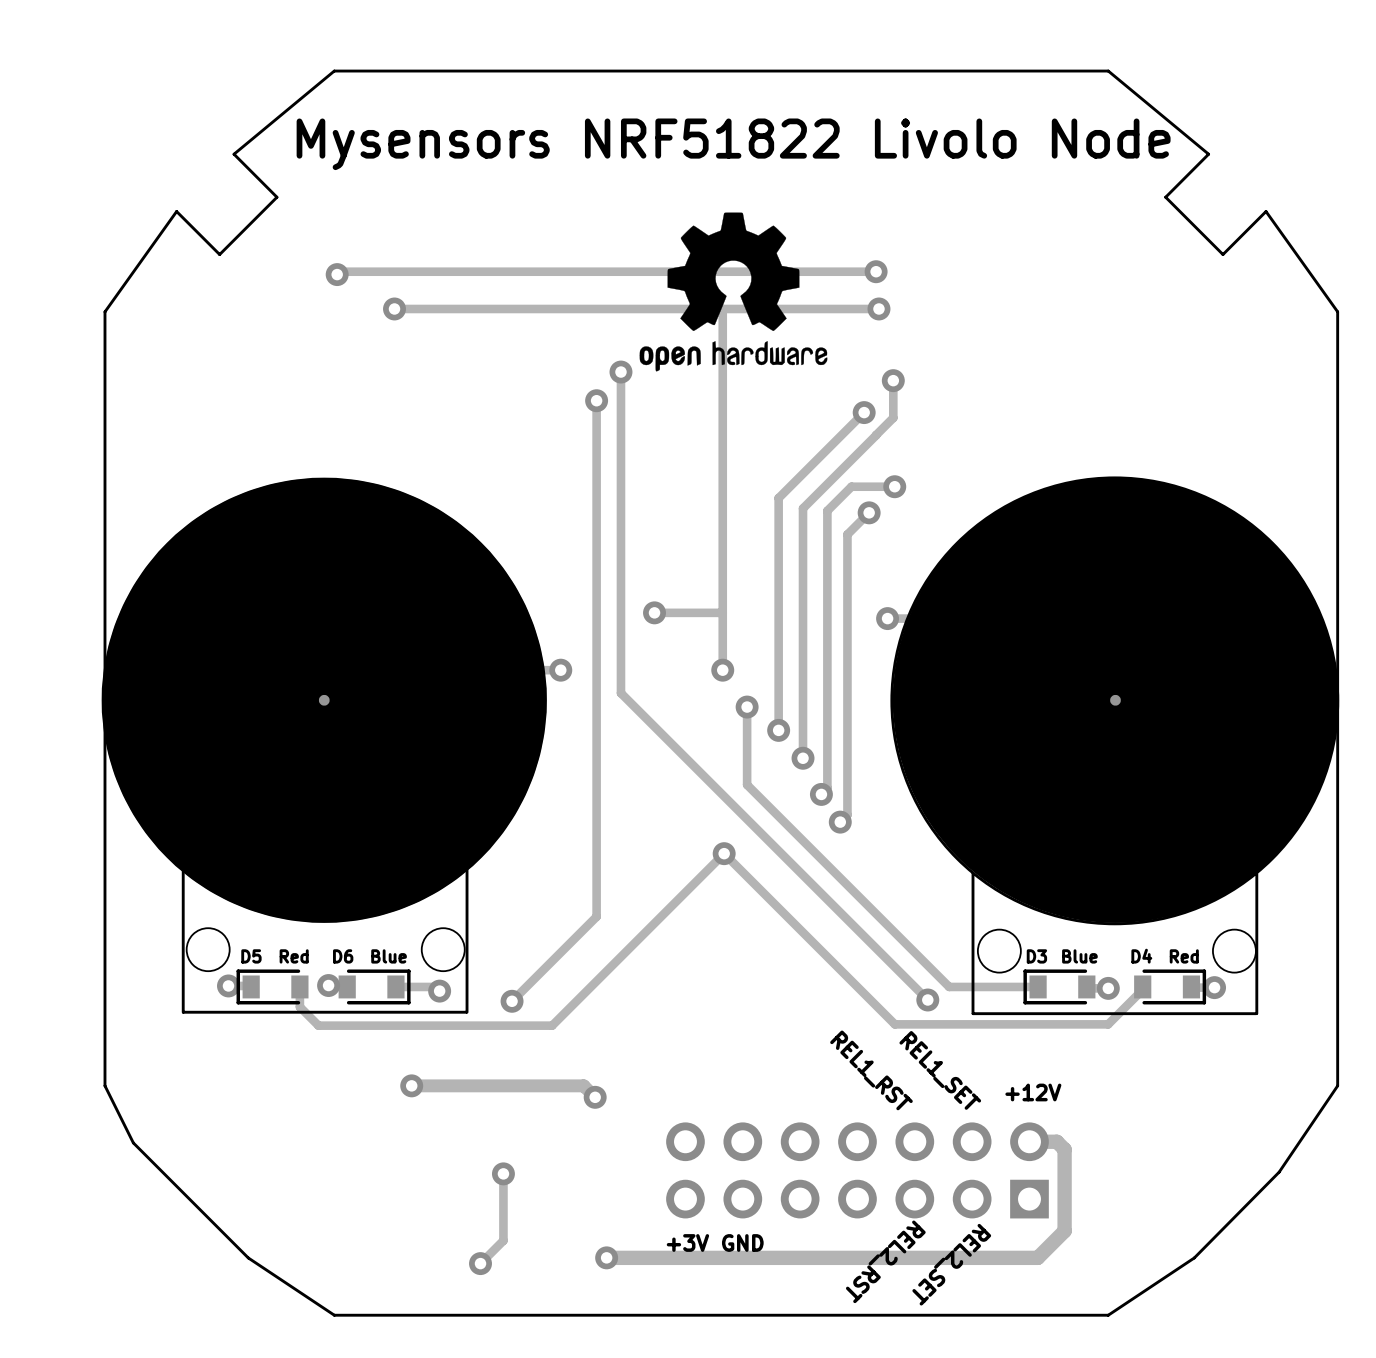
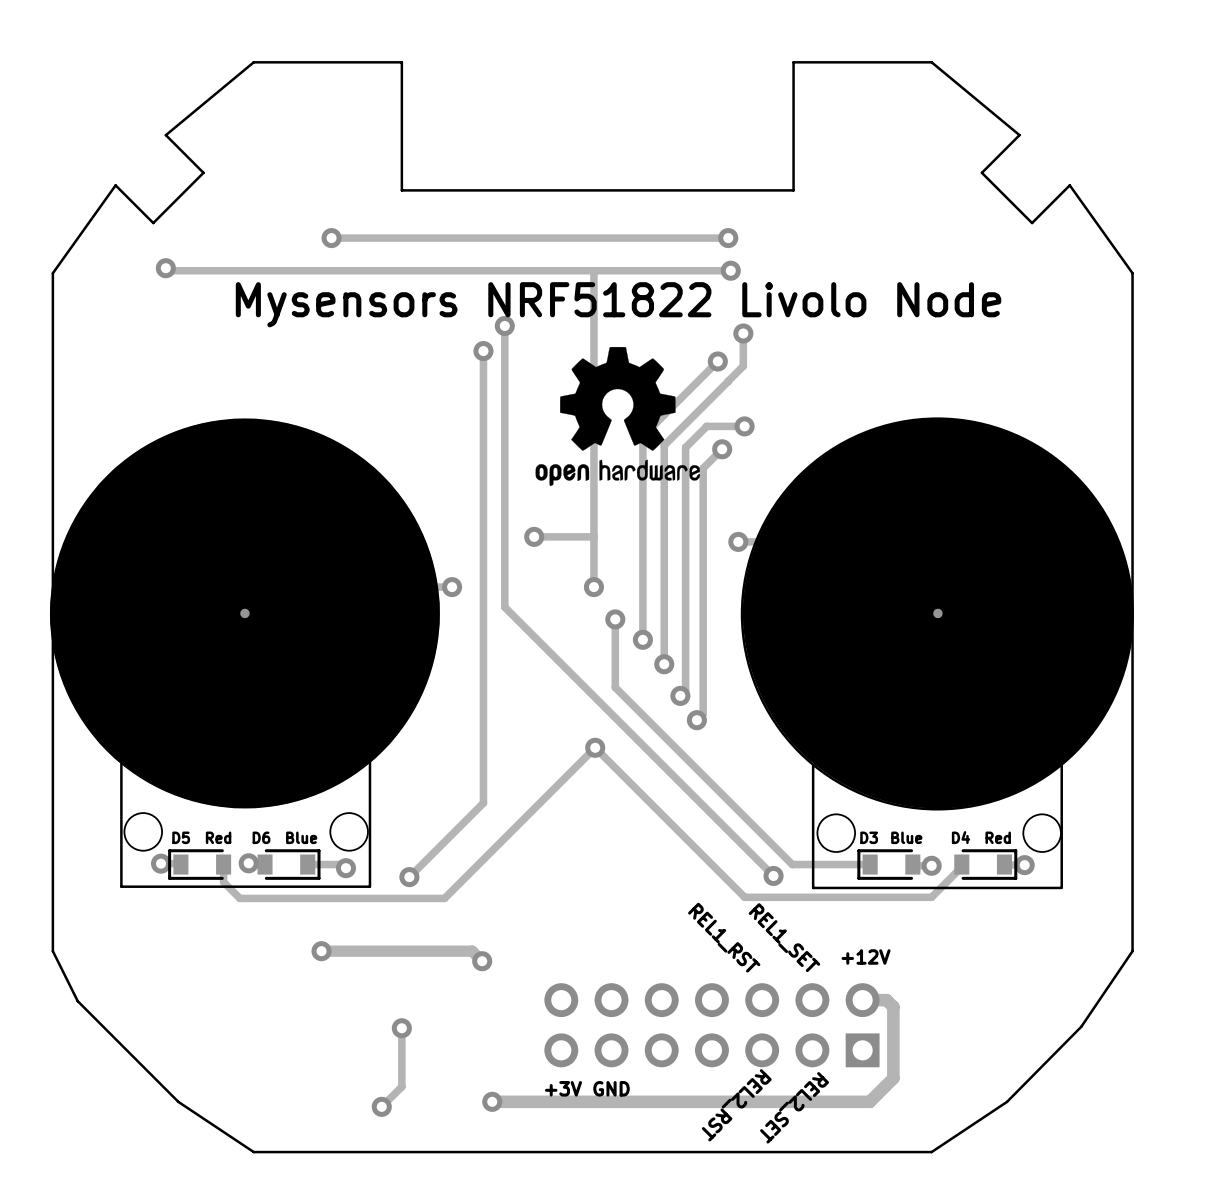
board edge: (950, 71) (503, 71) -> (793, 62) (793, 190) (401, 190) (401, 62)
text position: Mysensors NRF51822 Livolo Node (733, 144) -> Mysensors NRF51822 Livolo Node (618, 304)
track: (423, 271) (340, 271) (337, 274) -> none
via: none -> (331, 238)
via: (337, 274) -> none
drawing position: (733, 291) -> (617, 416)
track: none -> (165, 268) (168, 270) (306, 270)
via: none -> (165, 268)
via: (394, 308) -> none

